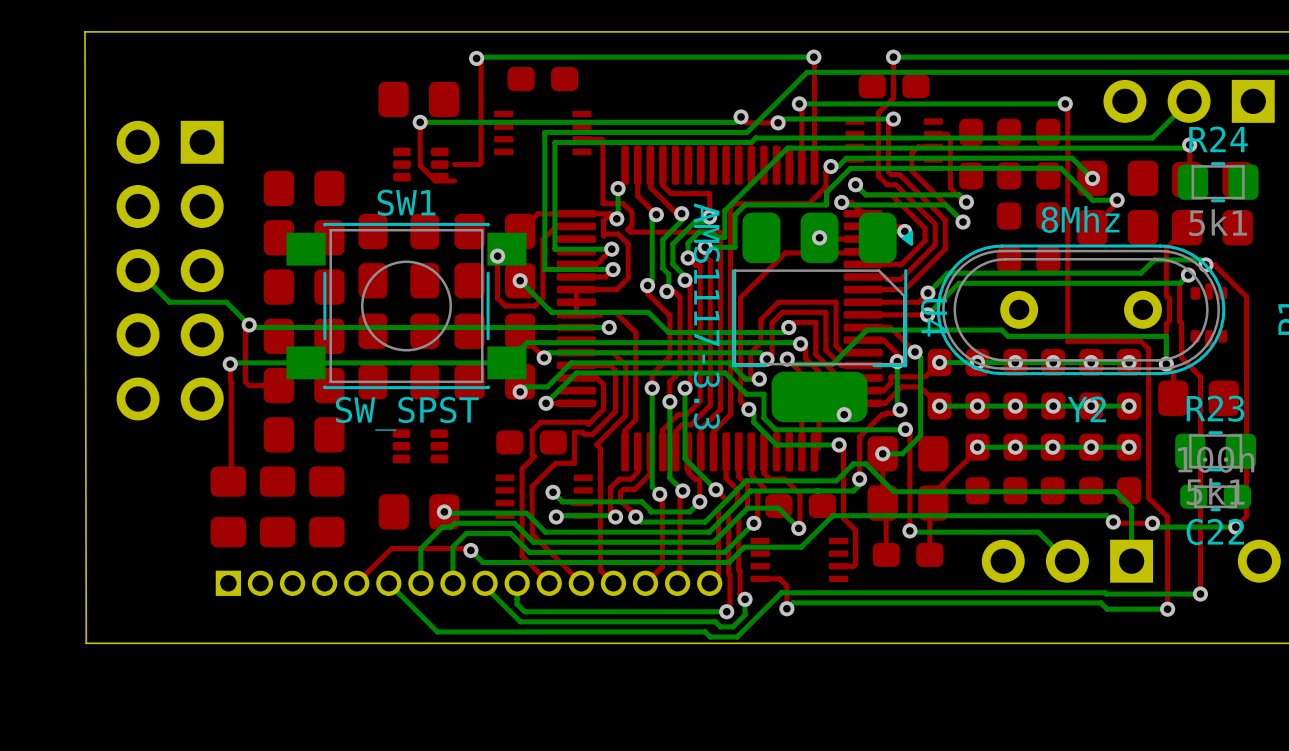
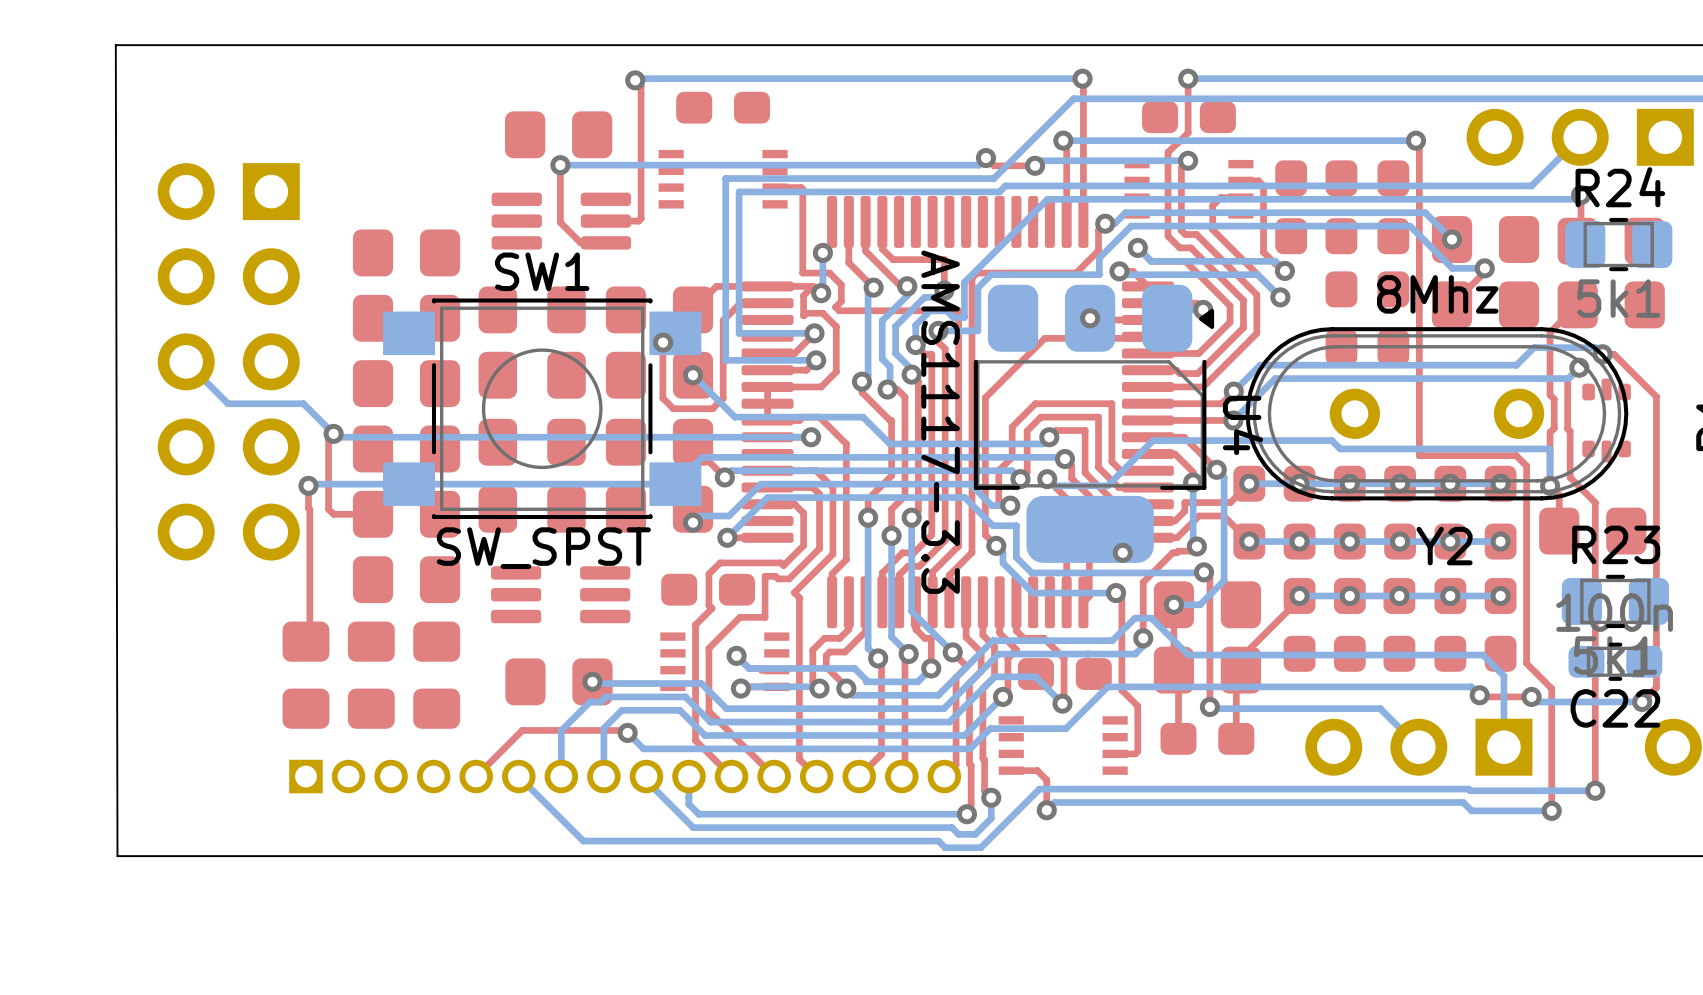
part footprint: [393, 147, 449, 182] -> [491, 192, 632, 250]
part footprint: [392, 429, 449, 464] -> [490, 566, 631, 624]

